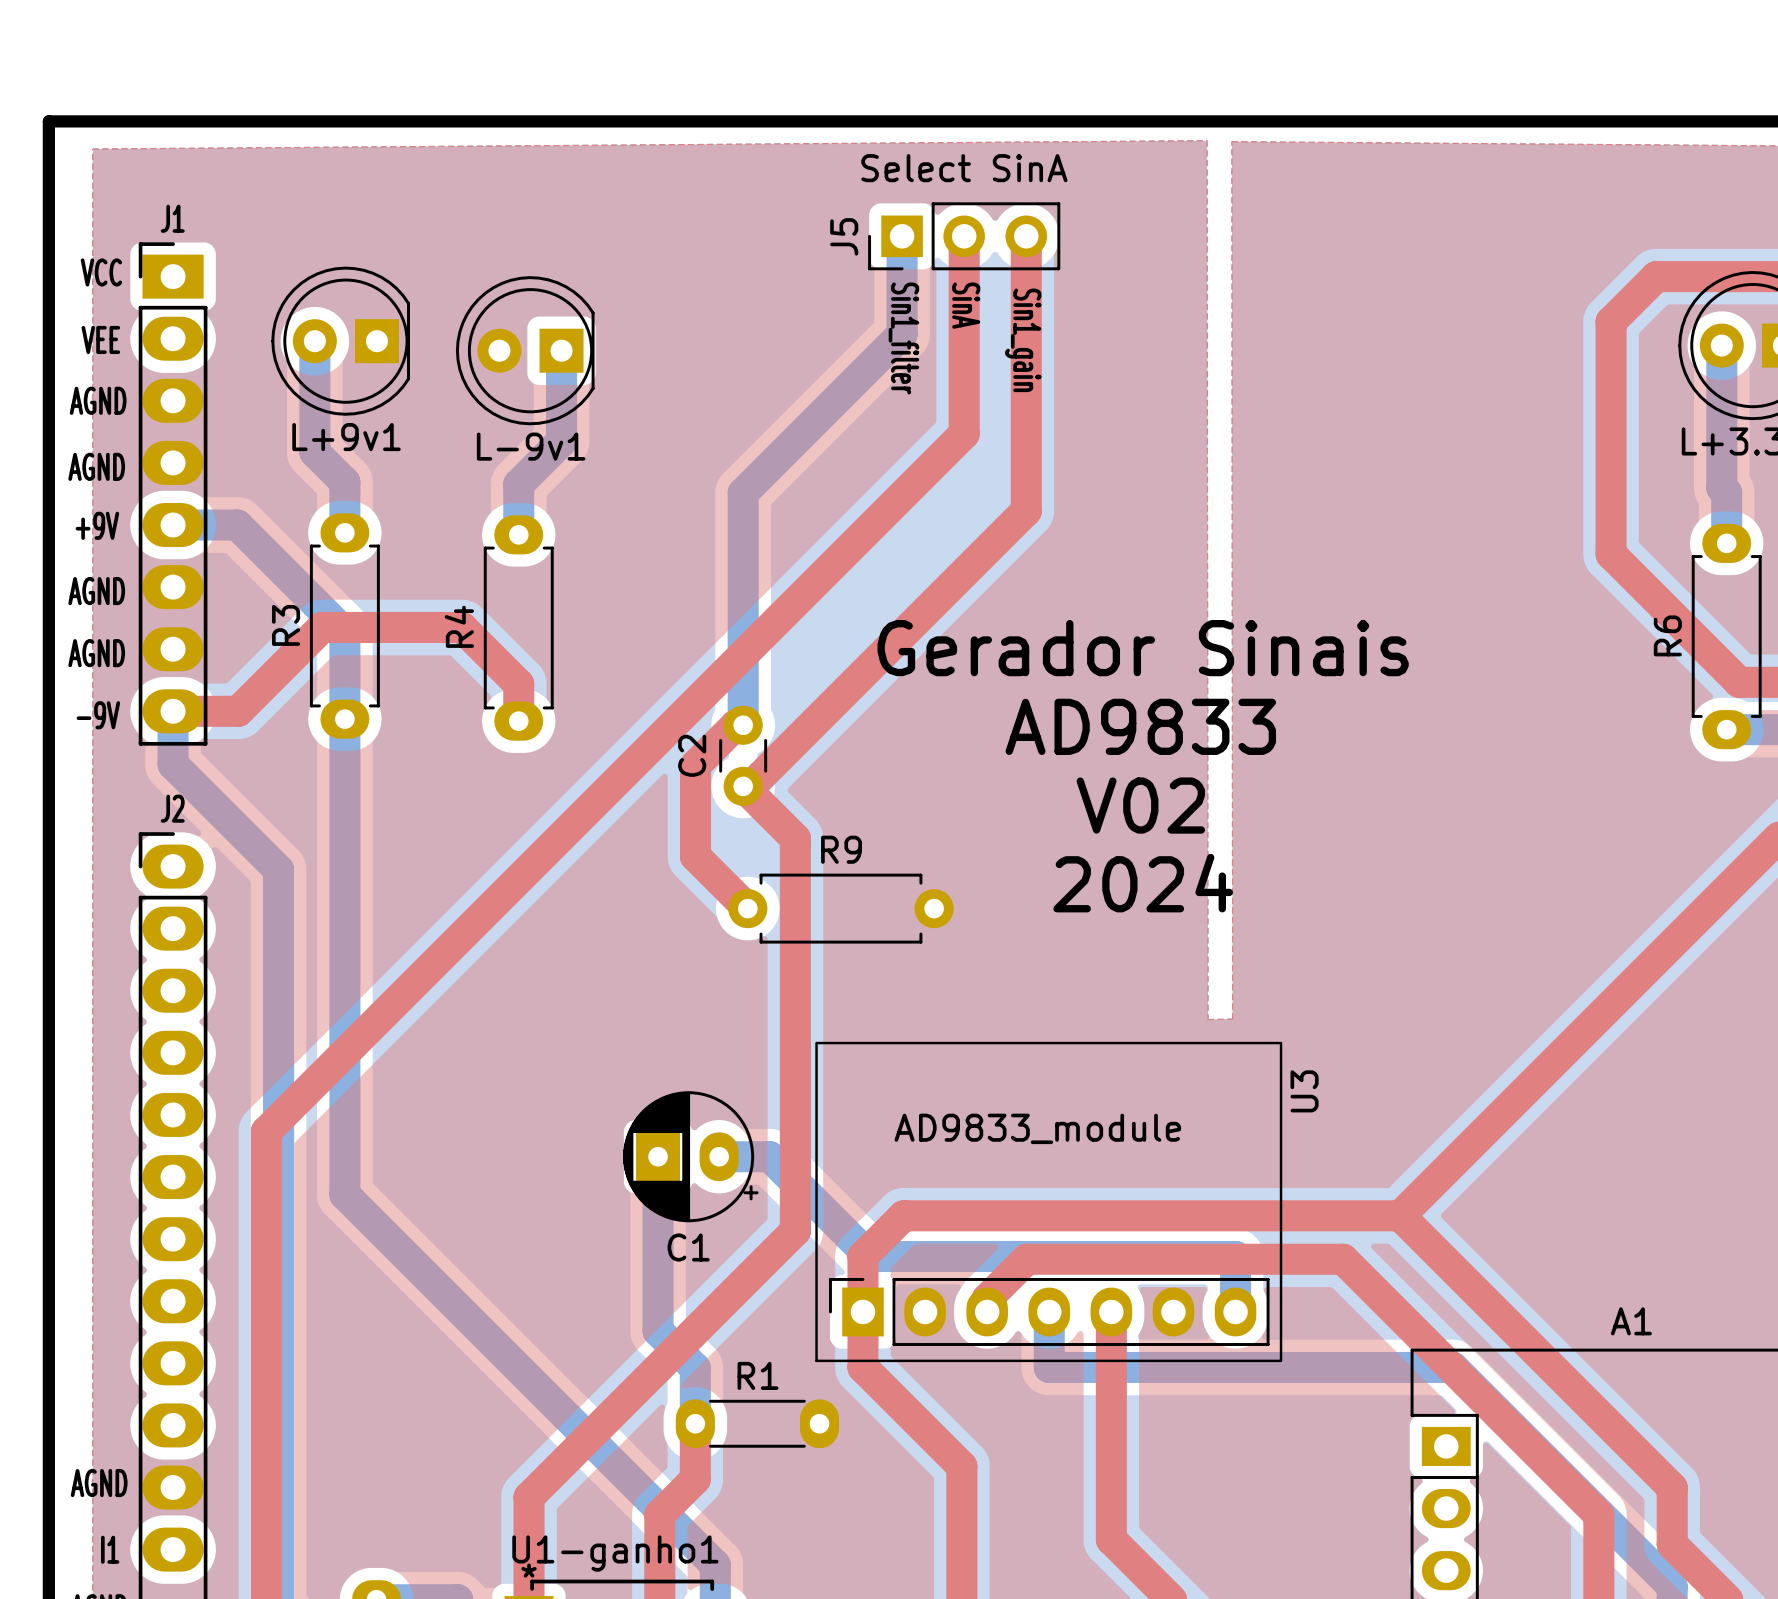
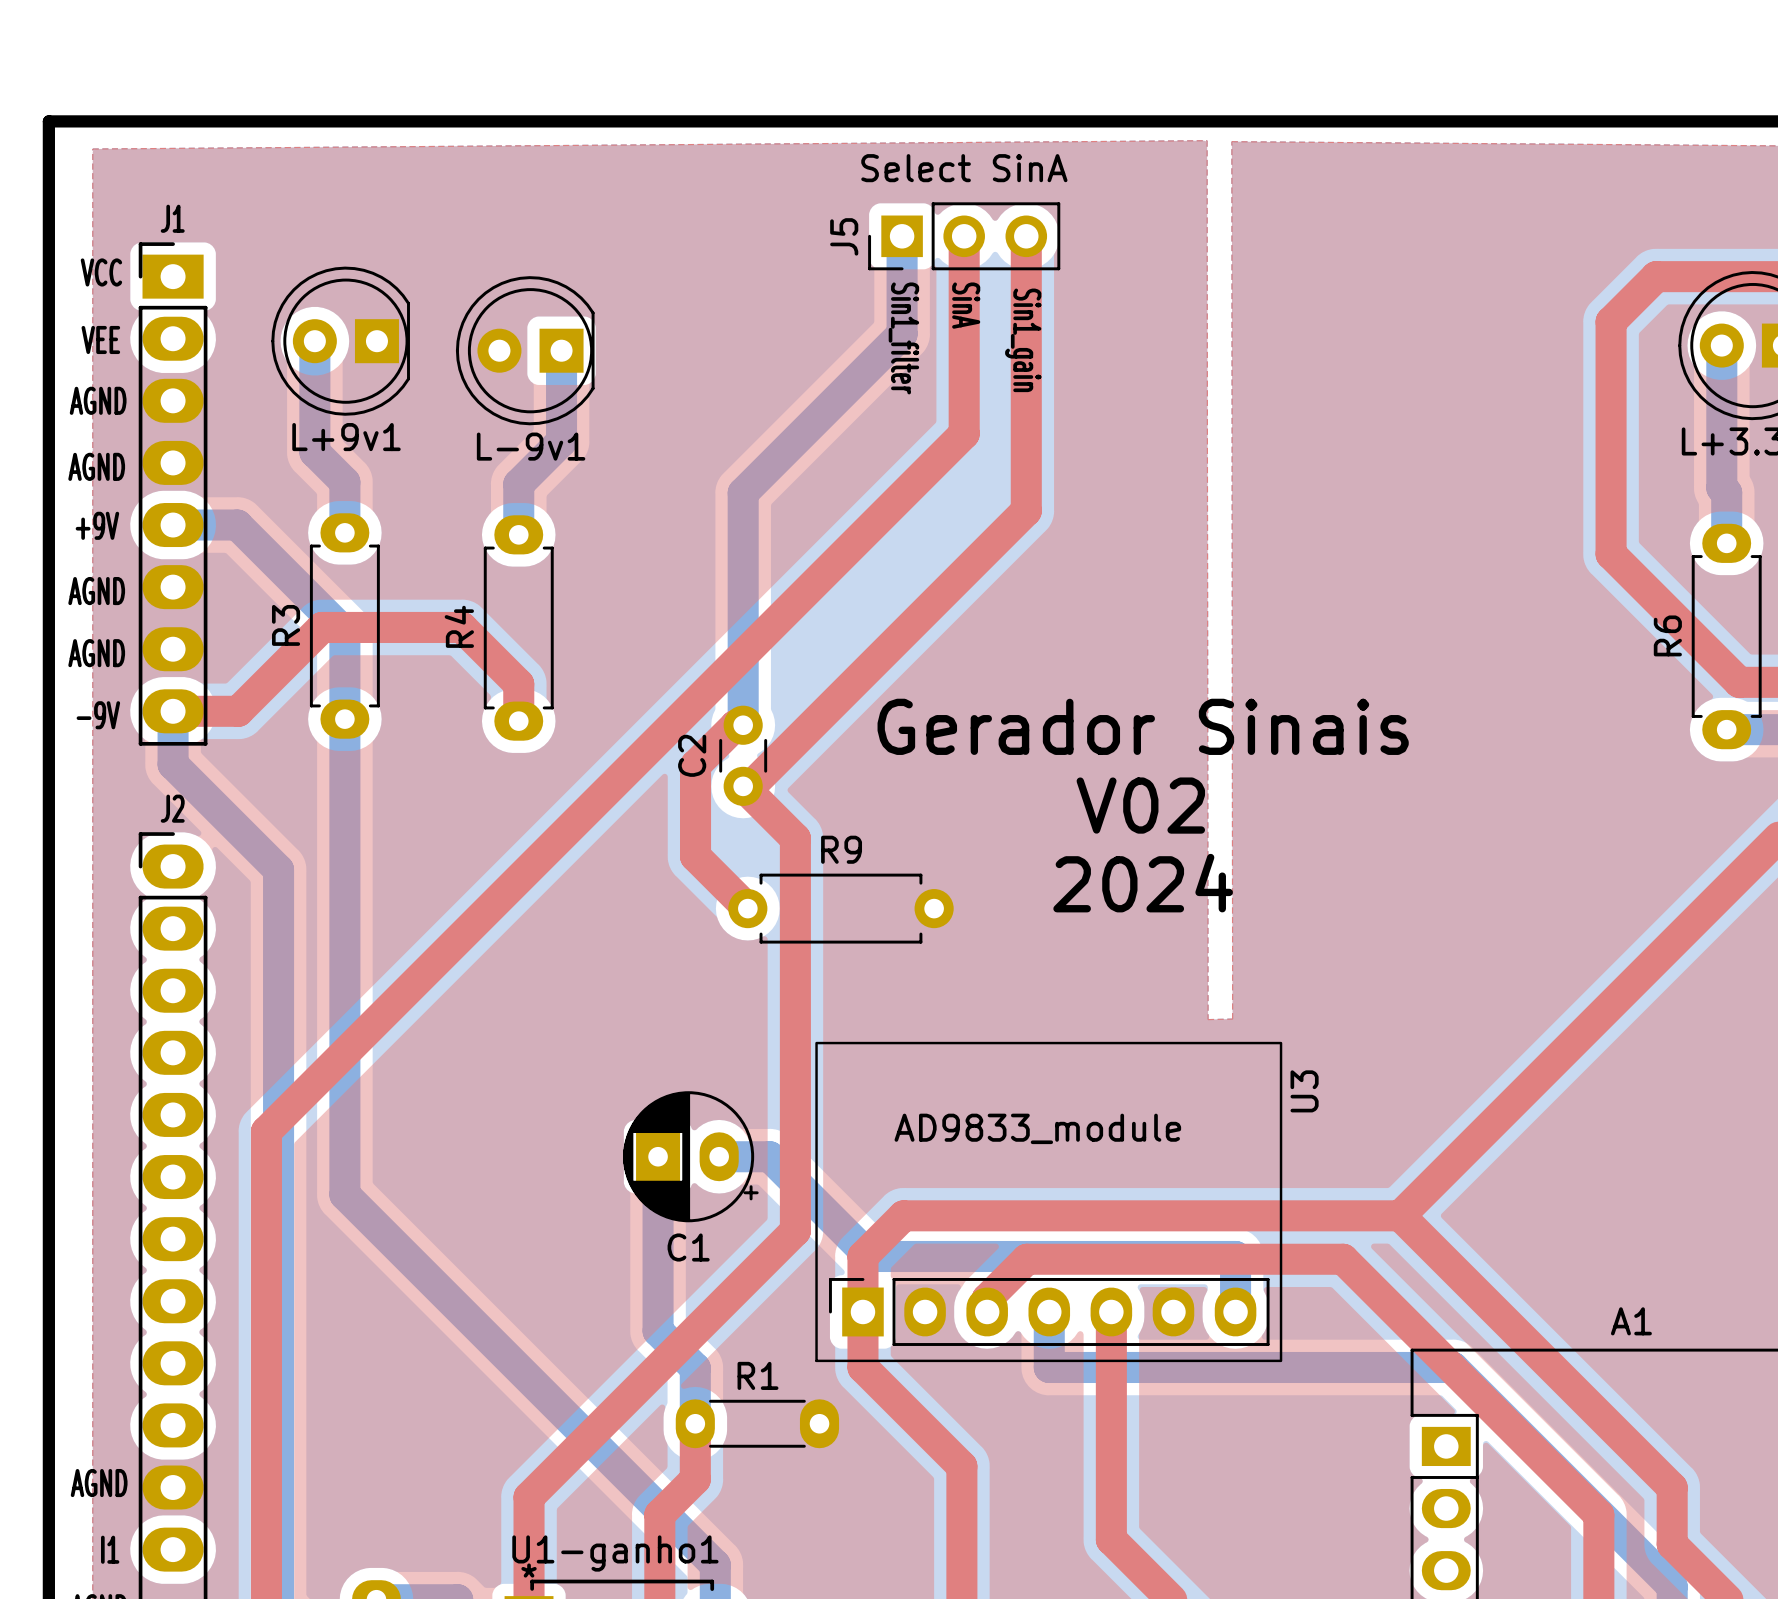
text: Gerador Sinais (1143, 648) -> none
text: AD9833 (1140, 726) -> Gerador Sinais (1143, 726)

